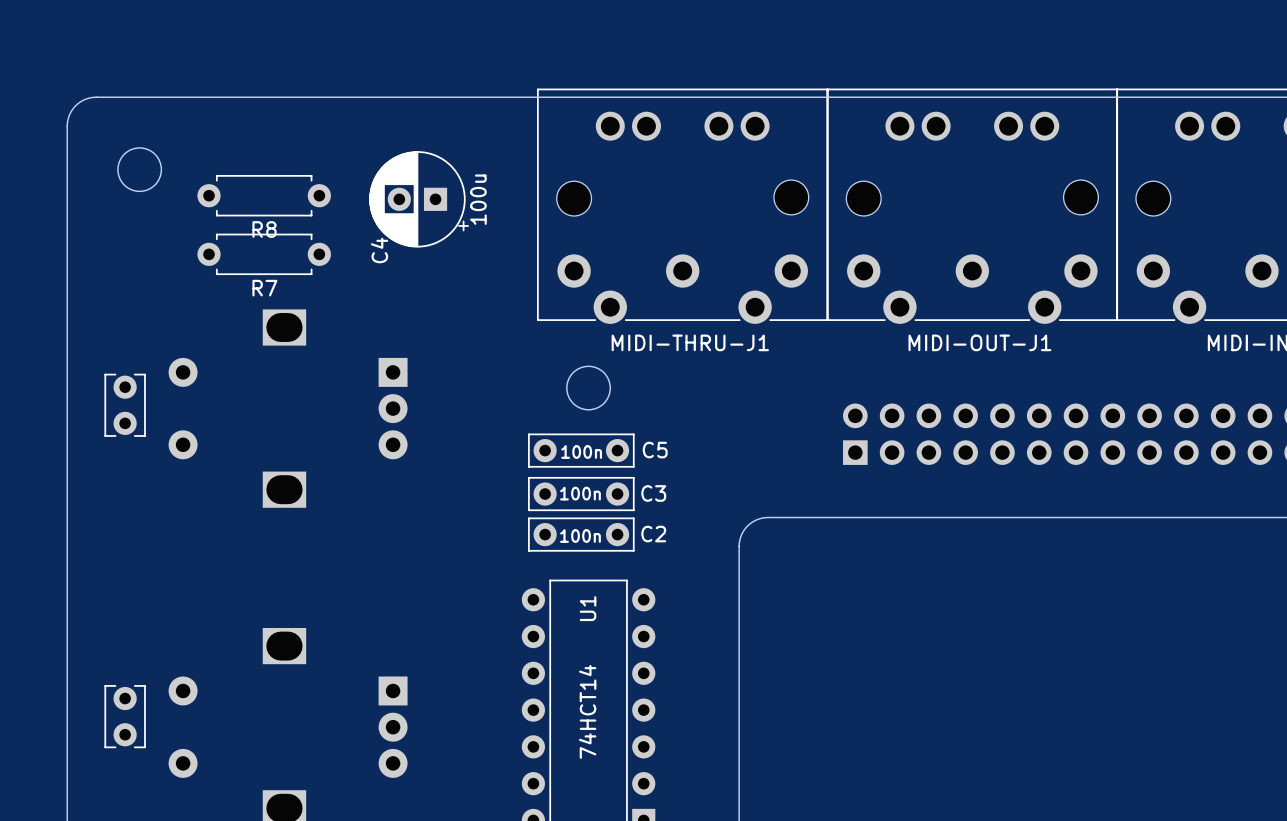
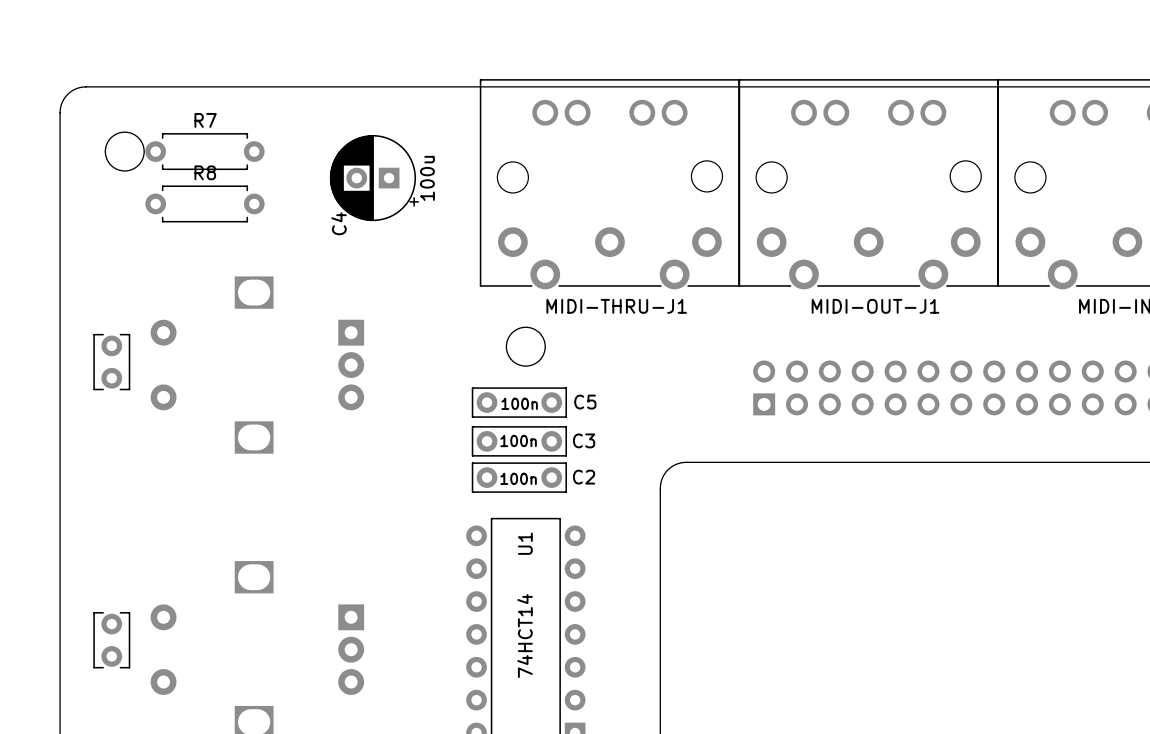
R8 position: (264, 195) -> (204, 203)
R8 name position: R8 (264, 229) -> R8 (205, 172)
R7 position: (264, 254) -> (204, 151)
R7 name position: R7 (264, 288) -> R7 (205, 120)

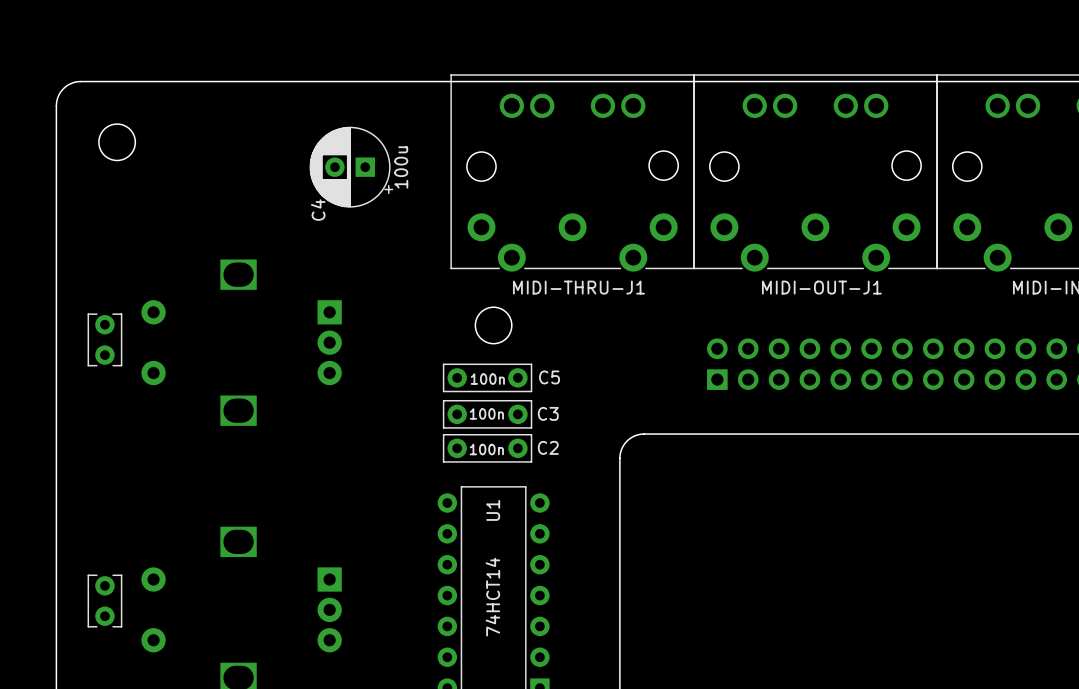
R7: (204, 151) -> none
R8: (204, 203) -> none

